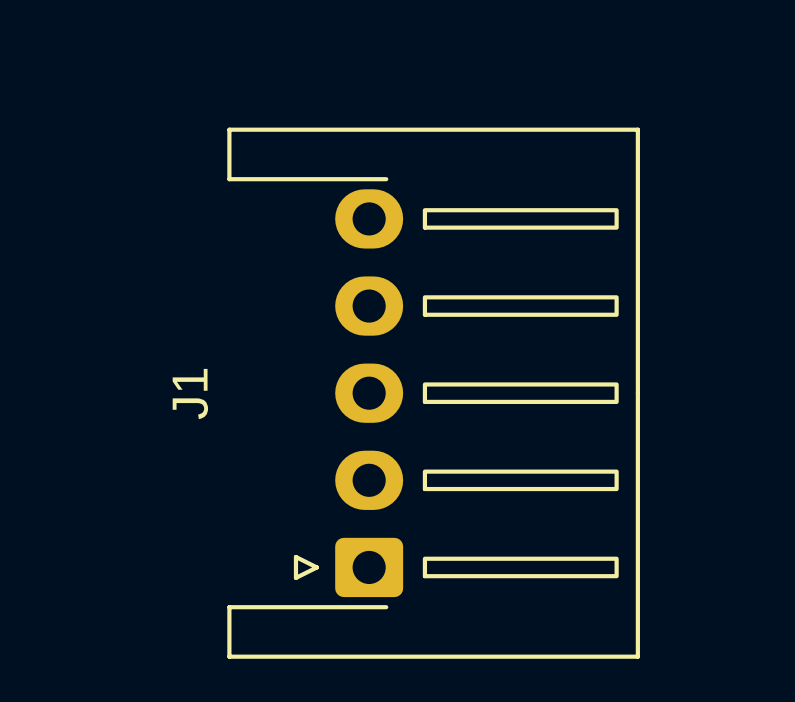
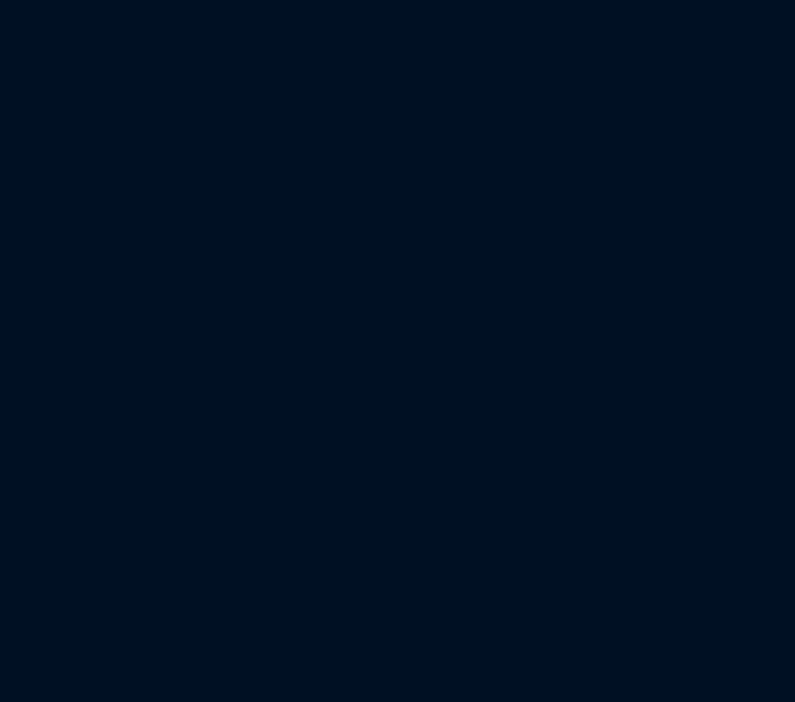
J1: (433, 393) -> none

